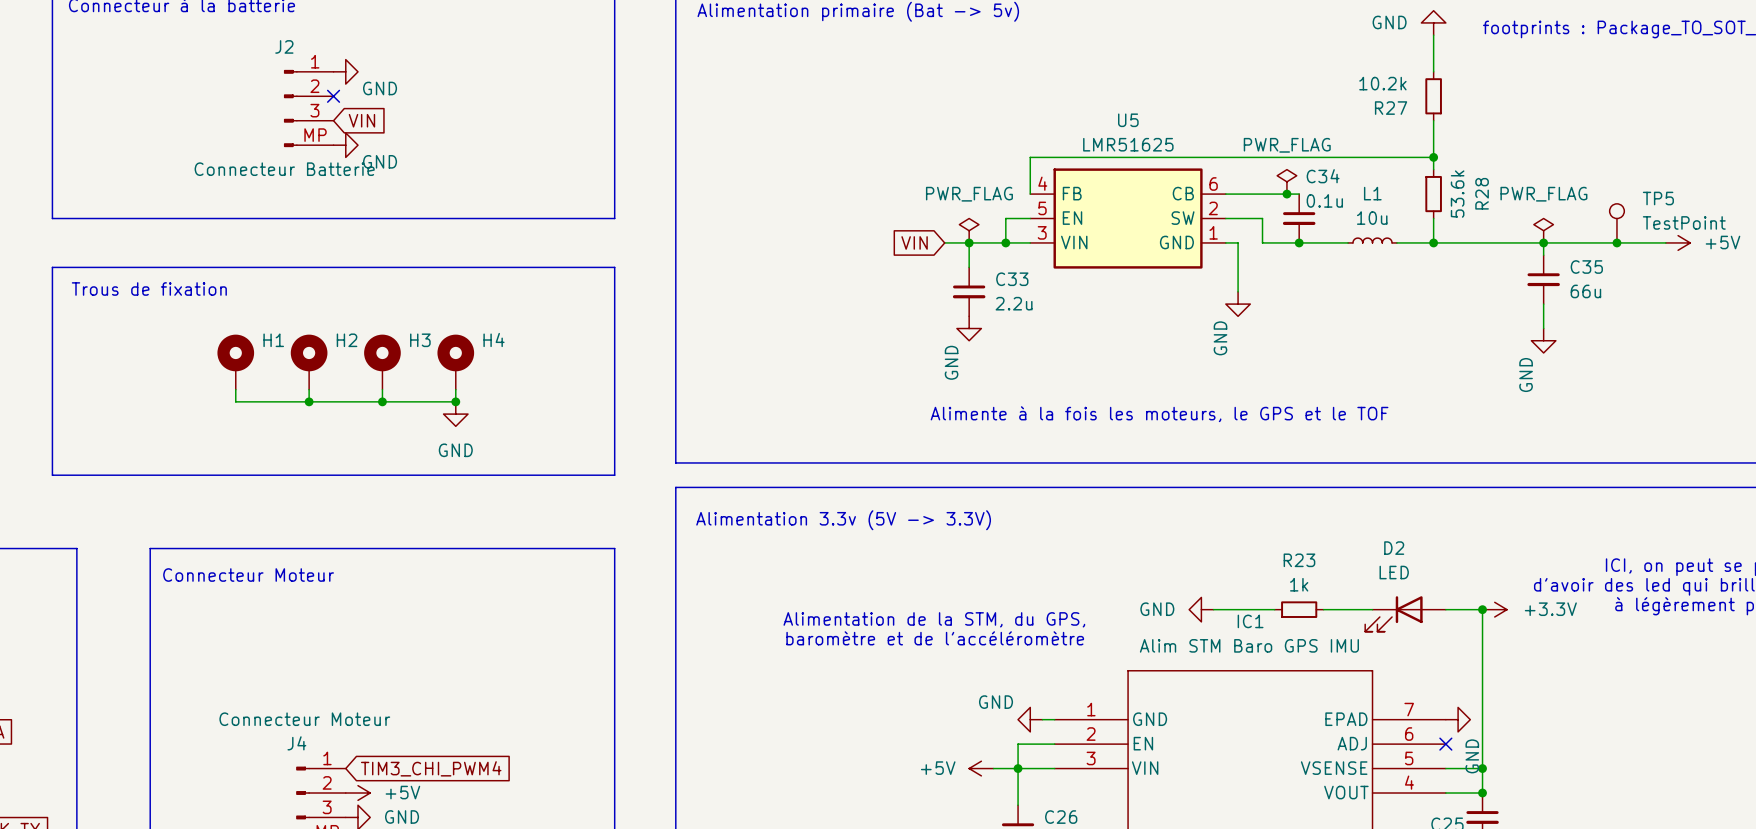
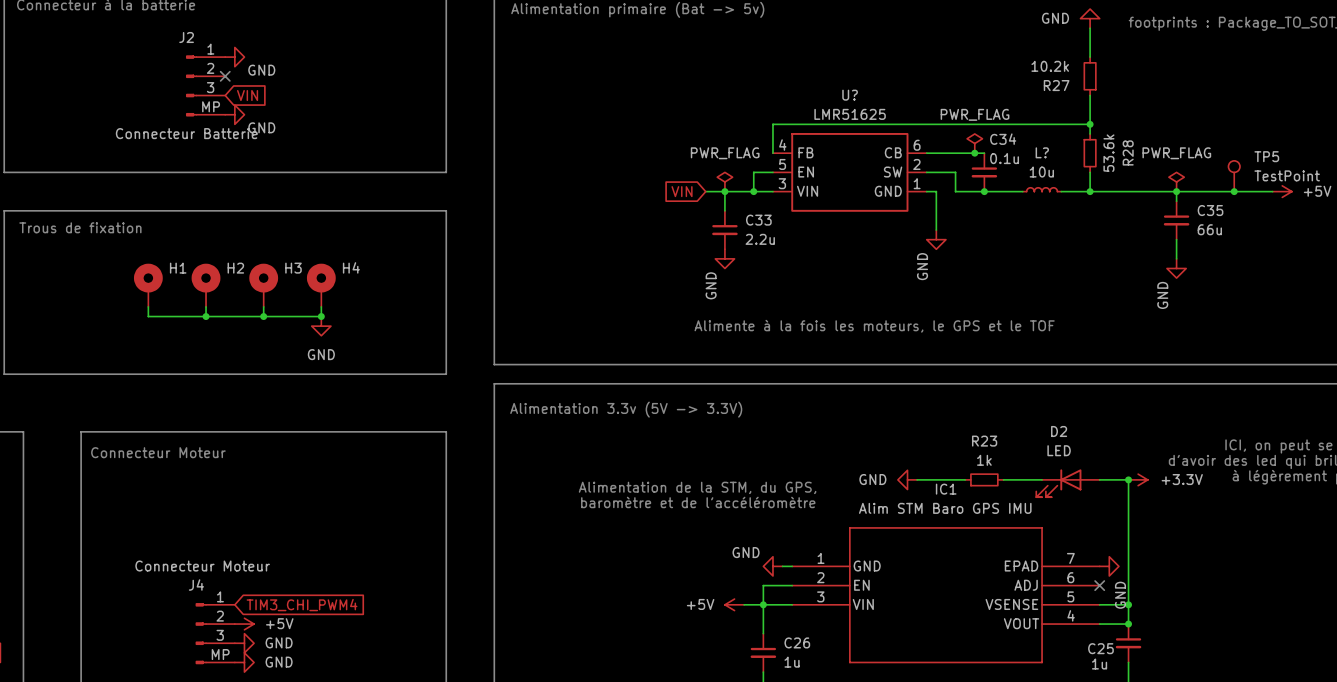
U5 name: U5 (1128, 120) -> U? (850, 95)
L1 name: L1 (1372, 193) -> L? (1042, 152)

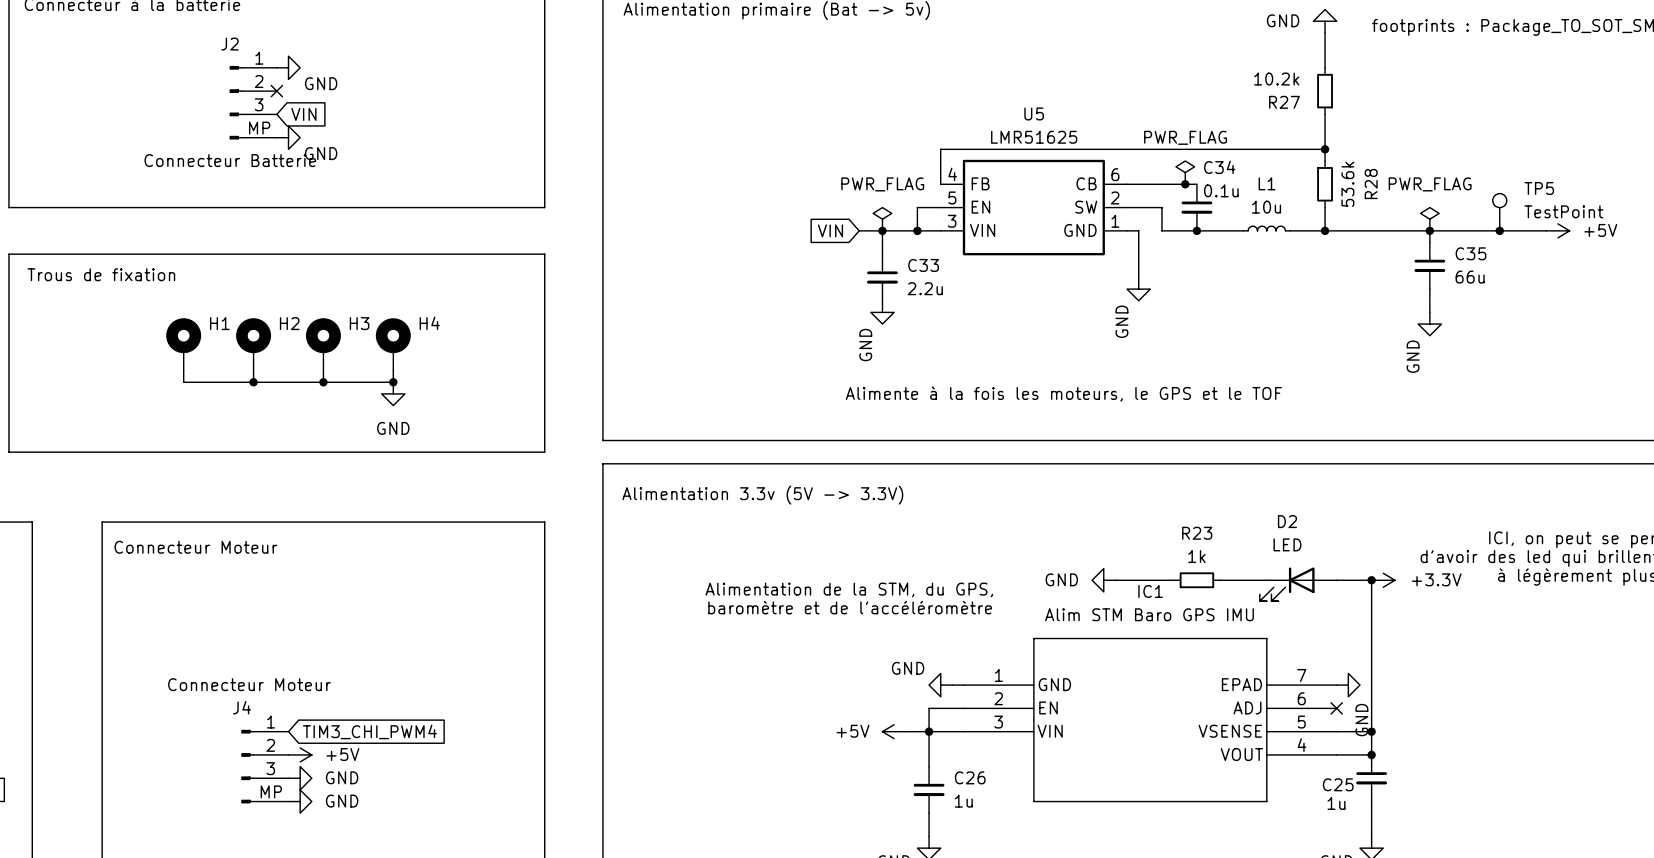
U? name: U? (850, 95) -> U5 (1034, 113)
L? name: L? (1042, 152) -> L1 (1267, 183)

